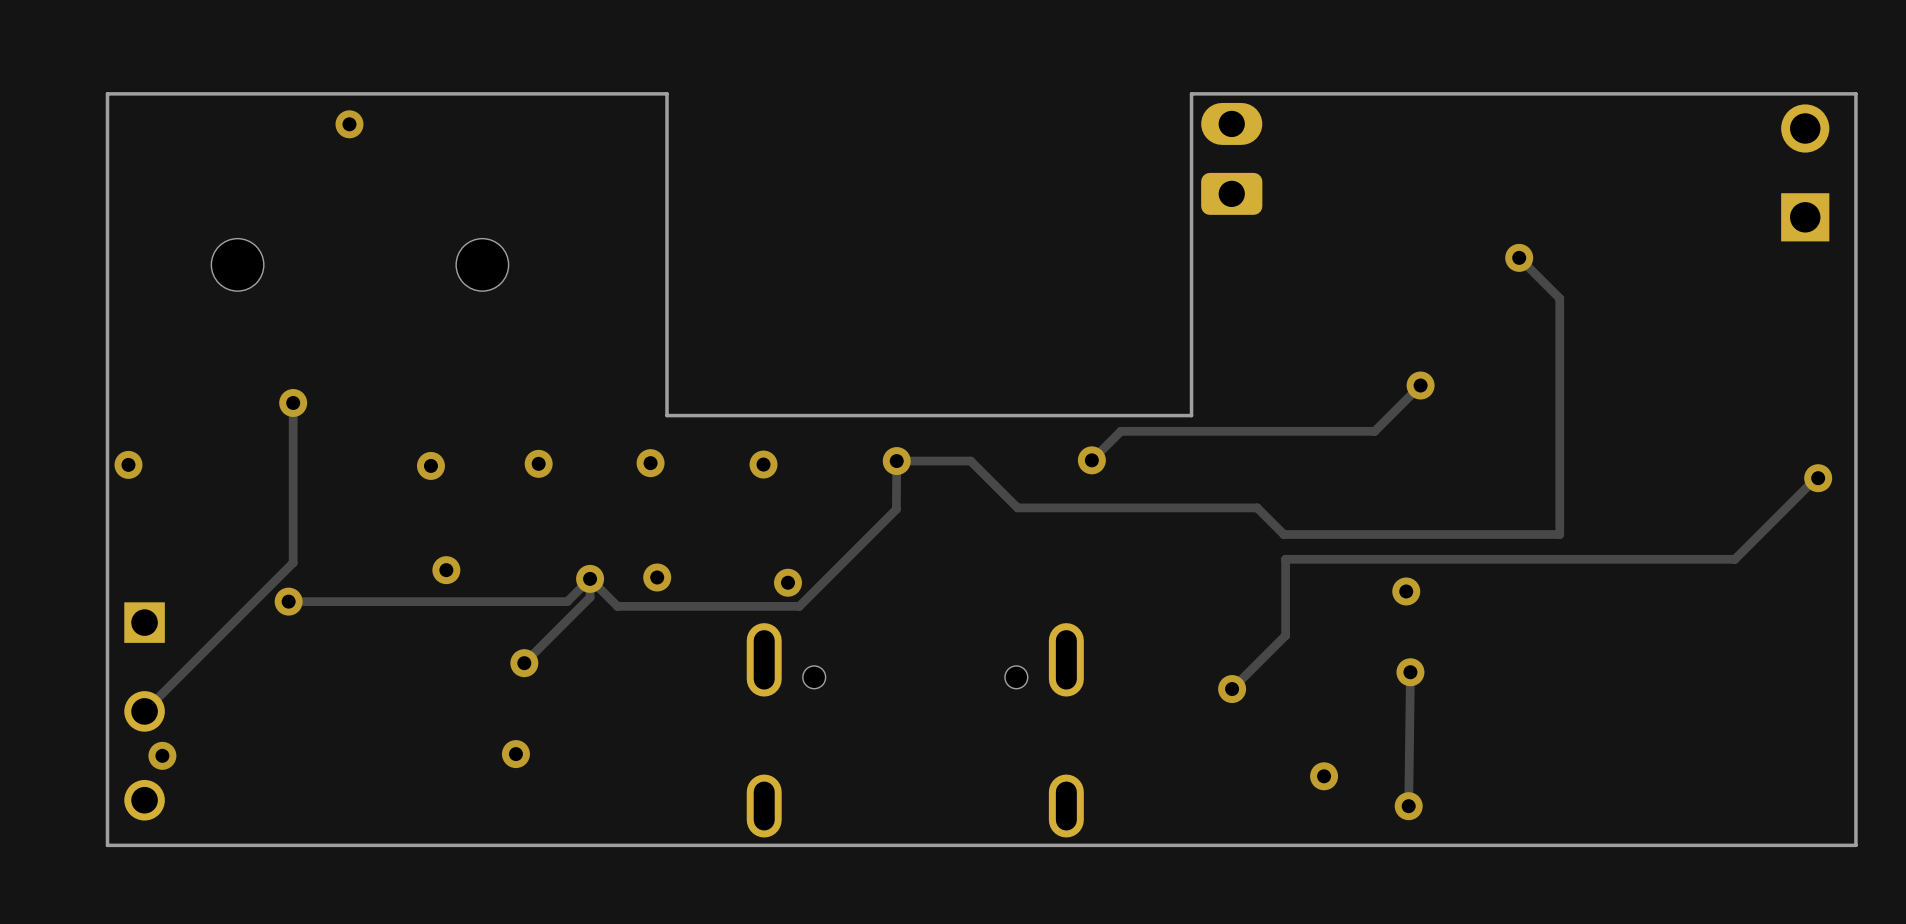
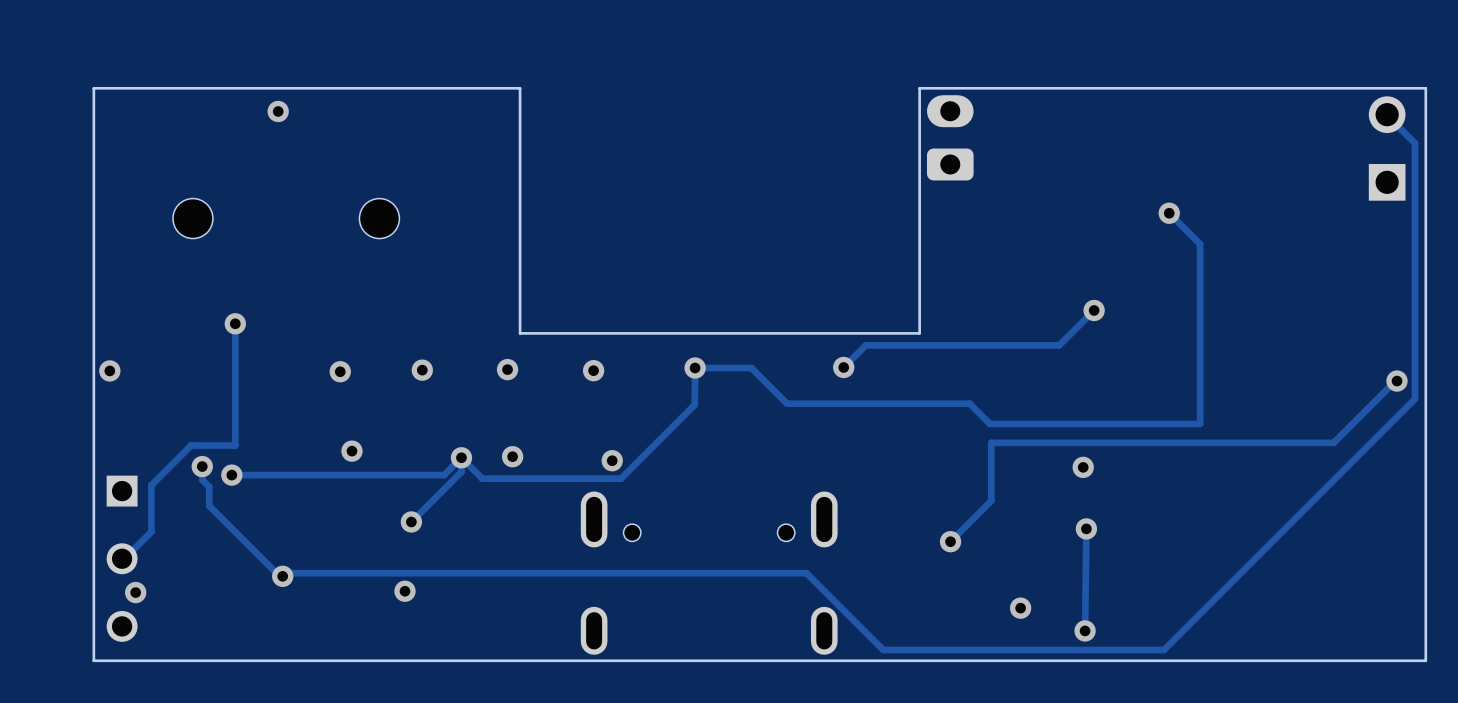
track: none -> (1387, 115) (1414, 143) (1414, 399) (1164, 650) (883, 650) (806, 573) (285, 573) (279, 576) (209, 505) (209, 486) (202, 480) (202, 466) (202, 468)
track: (293, 562) (144, 711) -> (235, 445) (191, 445) (151, 485) (151, 531) (121, 561)
via: none -> (202, 466)
via: none -> (282, 576)

